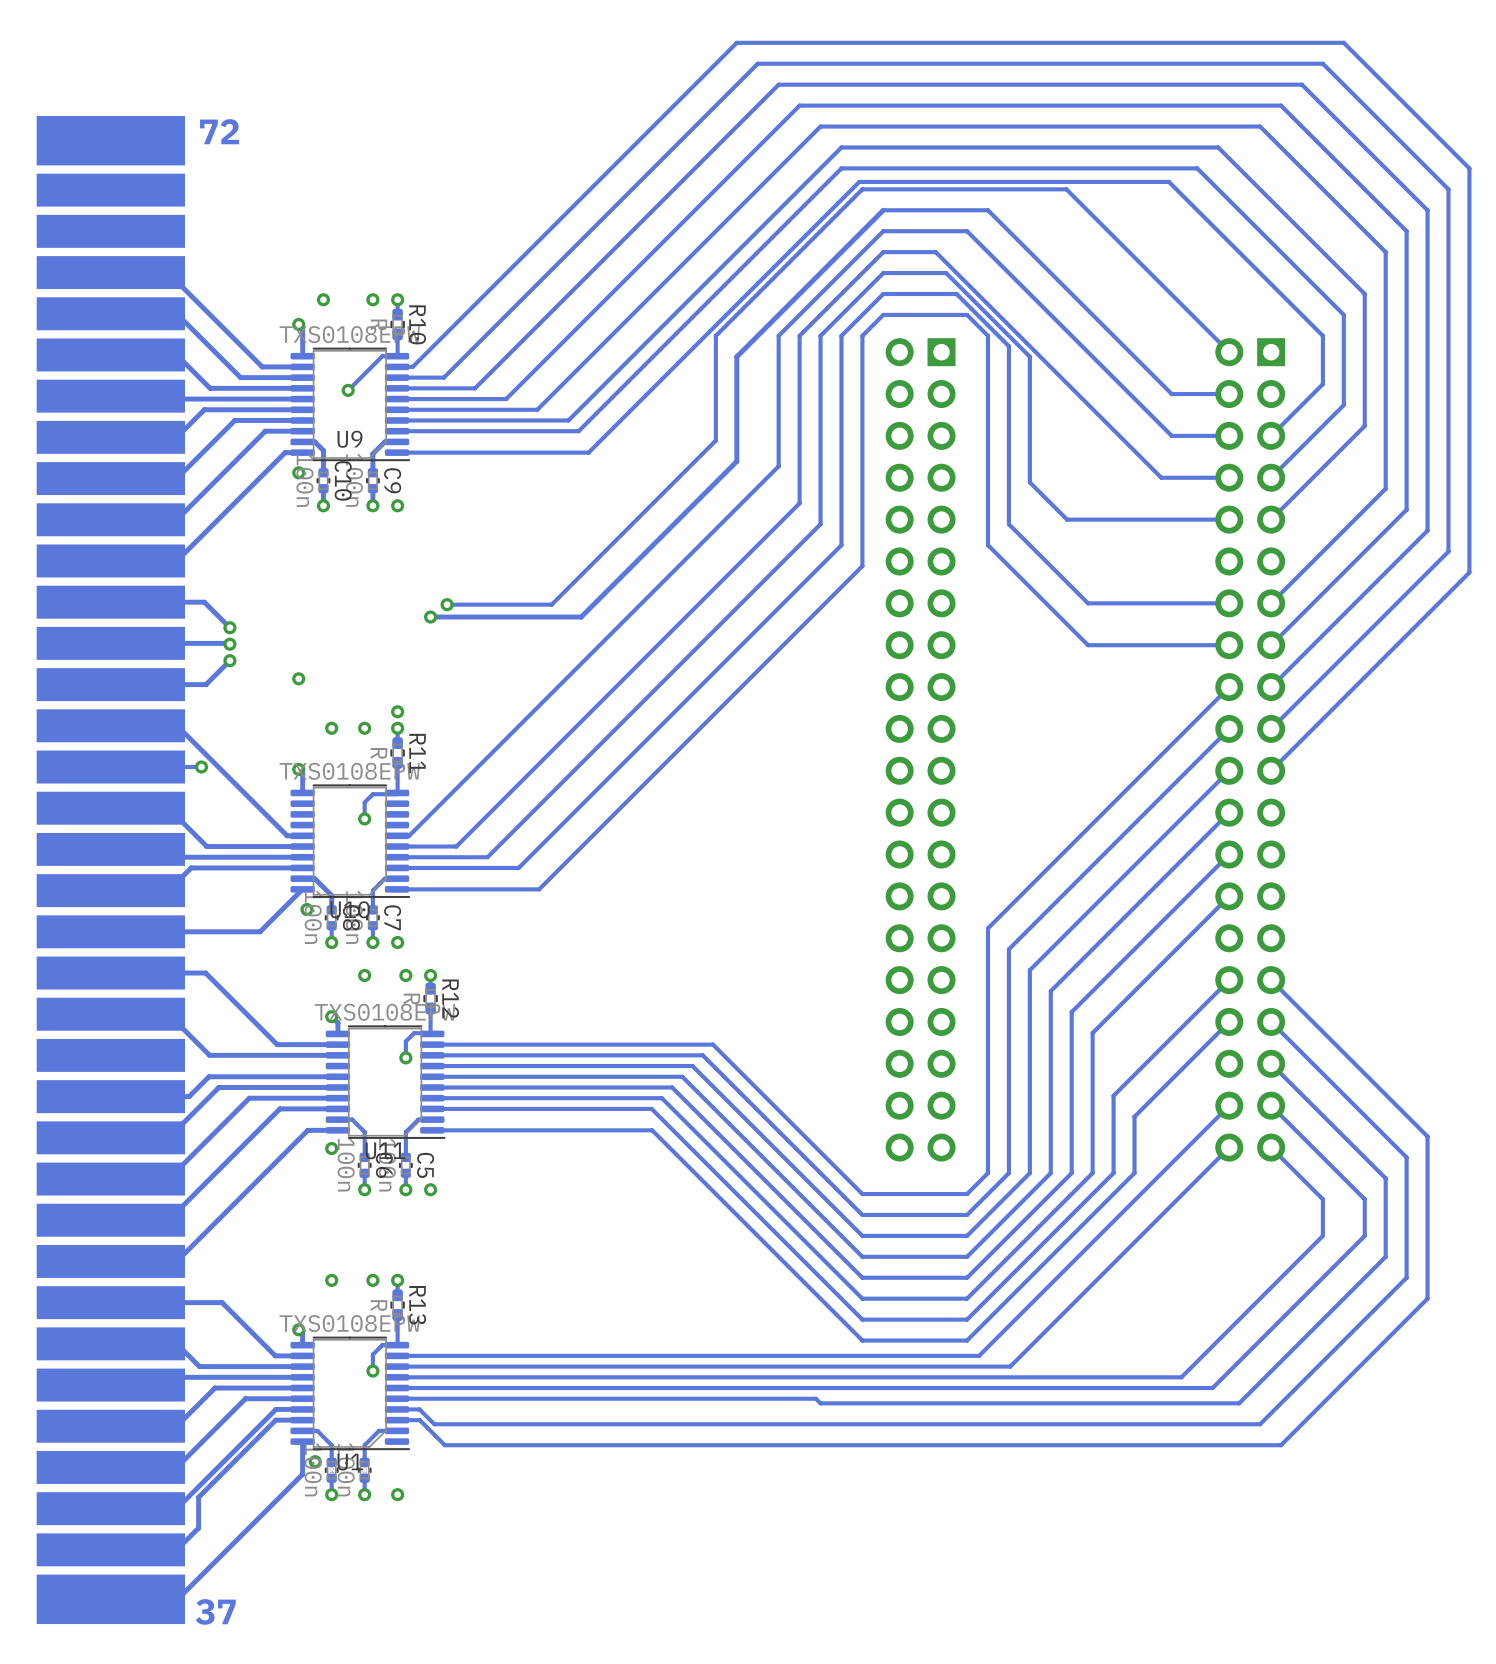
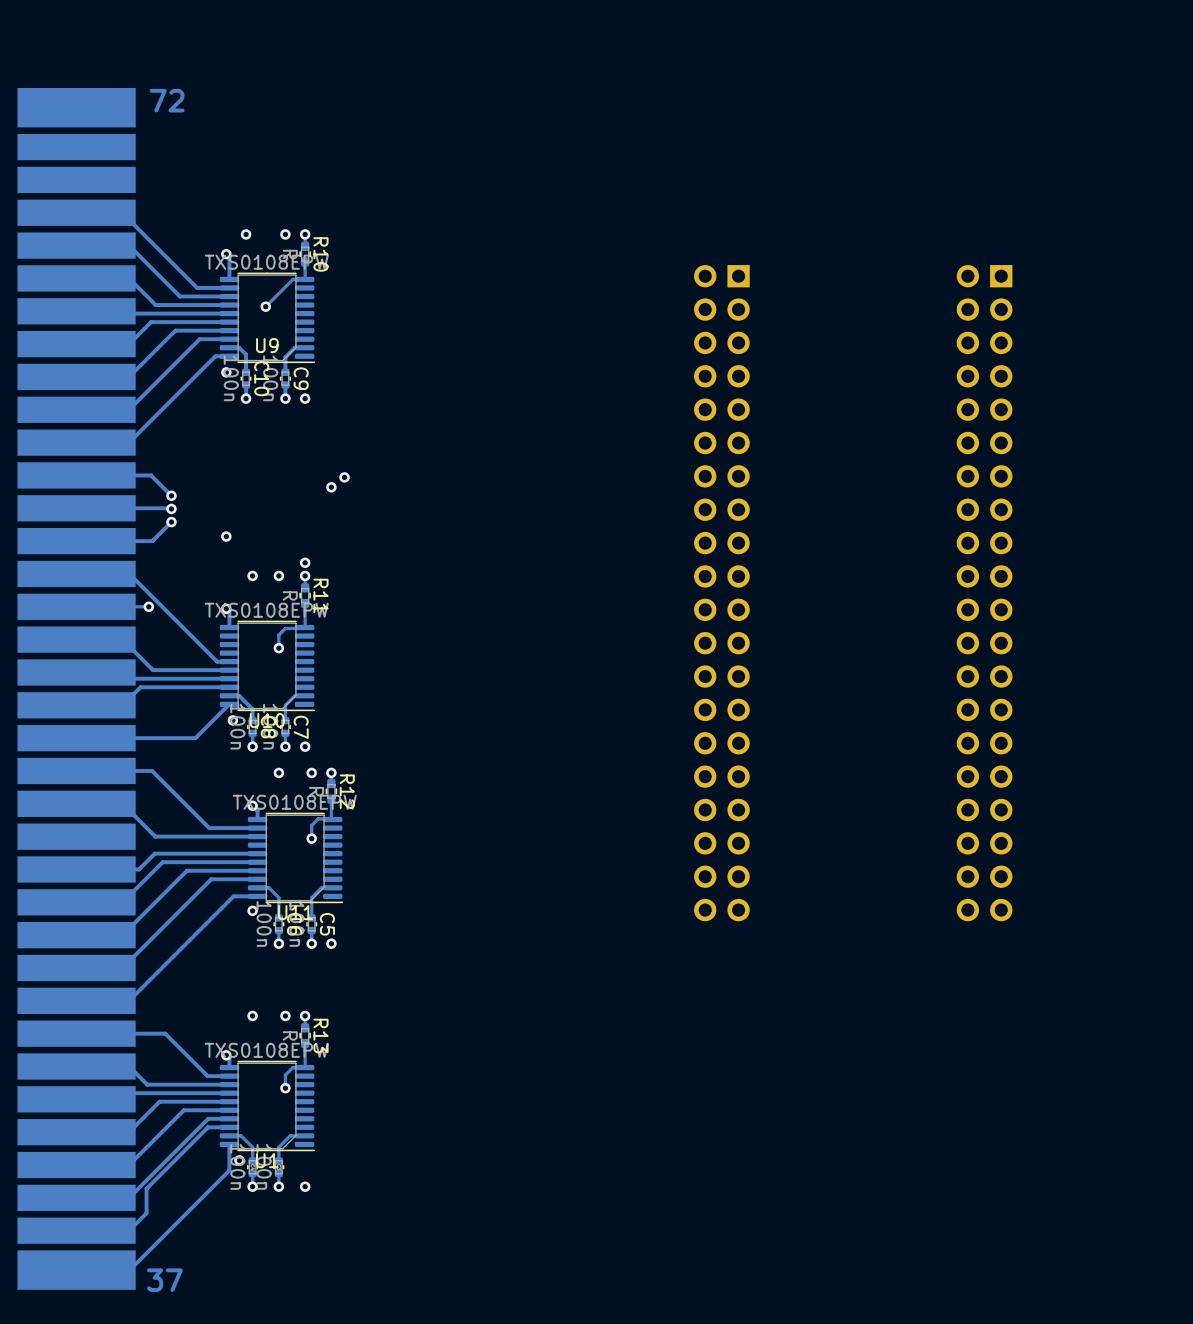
track: (1229, 352) (1066, 189) (862, 189) (715, 335) (715, 440) (551, 604) (447, 604) (450, 607) -> none
track: (397, 366) (412, 366) (736, 42) (1343, 42) (1469, 168) (1469, 572) (1271, 770) -> none
track: (397, 377) (443, 377) (757, 63) (1322, 63) (1448, 189) (1448, 551) (1271, 728) -> none
track: (397, 388) (475, 388) (778, 84) (1301, 84) (1427, 210) (1427, 530) (1271, 687) -> none
track: (1229, 394) (1171, 394) (987, 210) (883, 210) (736, 356) (736, 461) (581, 617) (430, 617) -> none
track: (397, 399) (506, 399) (799, 105) (1281, 105) (1406, 231) (1406, 509) (1271, 645) -> none
track: (397, 409) (537, 409) (820, 126) (1260, 126) (1385, 252) (1385, 488) (1271, 603) -> none
track: (397, 420) (568, 420) (841, 147) (1218, 147) (1364, 293) (1364, 426) (1271, 519) -> none
track: (397, 431) (578, 431) (841, 168) (1197, 168) (1343, 314) (1343, 405) (1271, 477) -> none
track: (1229, 435) (1171, 435) (967, 231) (883, 231) (778, 335) (778, 466) (409, 835) (397, 835) -> none
track: (1271, 435) (1322, 384) (1322, 335) (1168, 181) (859, 181) (588, 452) (397, 452) -> none
track: (1229, 477) (1161, 477) (935, 252) (883, 252) (799, 335) (799, 503) (456, 846) (397, 846) -> none
track: (1229, 519) (1067, 519) (1029, 482) (1029, 356) (946, 273) (883, 273) (820, 335) (820, 524) (487, 857) (397, 857) -> none
track: (1229, 603) (1088, 603) (1008, 524) (1008, 346) (956, 293) (883, 293) (841, 335) (841, 545) (518, 867) (397, 867) -> none
track: (1229, 645) (1088, 645) (987, 545) (987, 335) (967, 314) (883, 314) (862, 335) (862, 566) (539, 889) (397, 889) -> none
track: (1229, 687) (987, 928) (987, 1173) (967, 1194) (862, 1194) (713, 1044) (432, 1044) -> none
track: (1229, 728) (1008, 949) (1008, 1173) (967, 1214) (862, 1214) (702, 1055) (432, 1055) -> none
track: (1229, 770) (1029, 970) (1029, 1173) (967, 1235) (862, 1235) (692, 1066) (432, 1066) -> none
track: (1229, 812) (1050, 991) (1050, 1173) (967, 1256) (862, 1256) (682, 1076) (432, 1076) -> none
track: (1229, 854) (1071, 1012) (1071, 1173) (967, 1277) (862, 1277) (672, 1087) (432, 1087) -> none
track: (1229, 896) (1092, 1033) (1092, 1173) (967, 1298) (862, 1298) (661, 1098) (432, 1098) -> none
track: (1229, 980) (1113, 1095) (1113, 1173) (967, 1319) (862, 1319) (651, 1108) (432, 1108) -> none
track: (1271, 980) (1427, 1136) (1427, 1298) (1281, 1445) (444, 1445) (419, 1420) (396, 1420) -> none
track: (1229, 1021) (1134, 1116) (1134, 1173) (967, 1340) (862, 1340) (652, 1130) (432, 1130) -> none
track: (1271, 1021) (1406, 1157) (1406, 1277) (1260, 1424) (434, 1424) (419, 1409) (396, 1409) -> none
track: (1271, 1063) (1385, 1178) (1385, 1256) (1239, 1403) (820, 1403) (815, 1398) (396, 1398) -> none
track: (1229, 1105) (979, 1355) (396, 1355) -> none
track: (1271, 1105) (1364, 1199) (1364, 1235) (1212, 1388) (396, 1388) -> none
track: (1229, 1147) (1010, 1366) (396, 1366) -> none
track: (1271, 1147) (1322, 1199) (1322, 1235) (1181, 1377) (396, 1377) -> none

